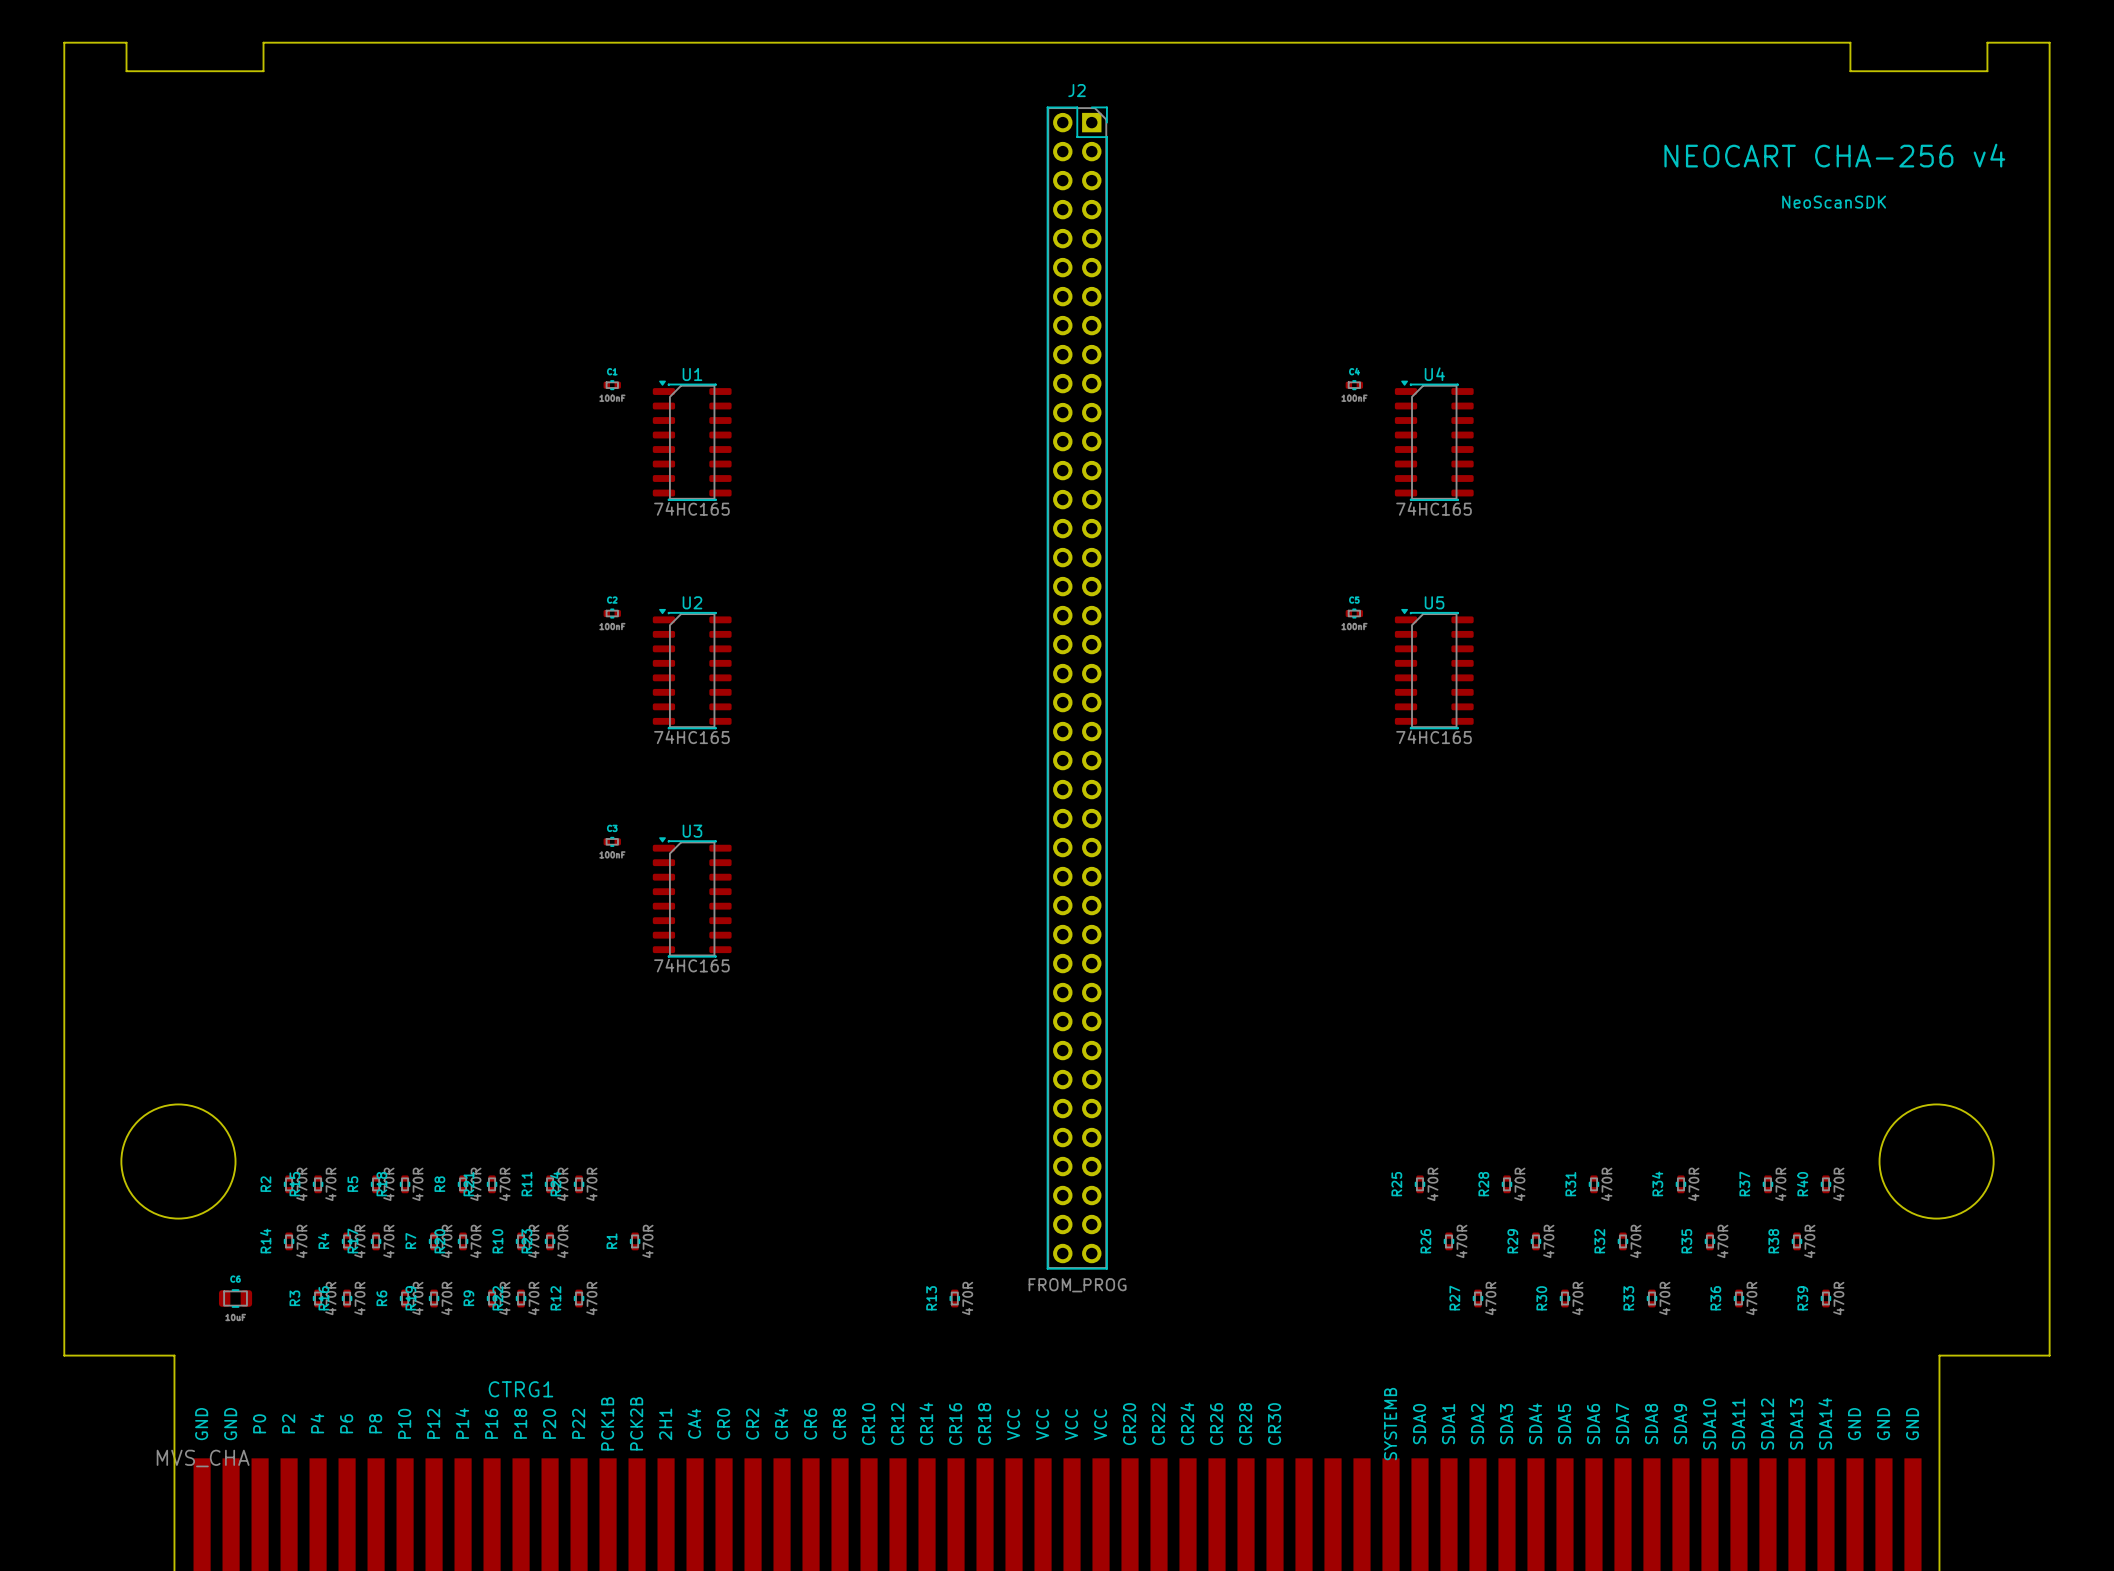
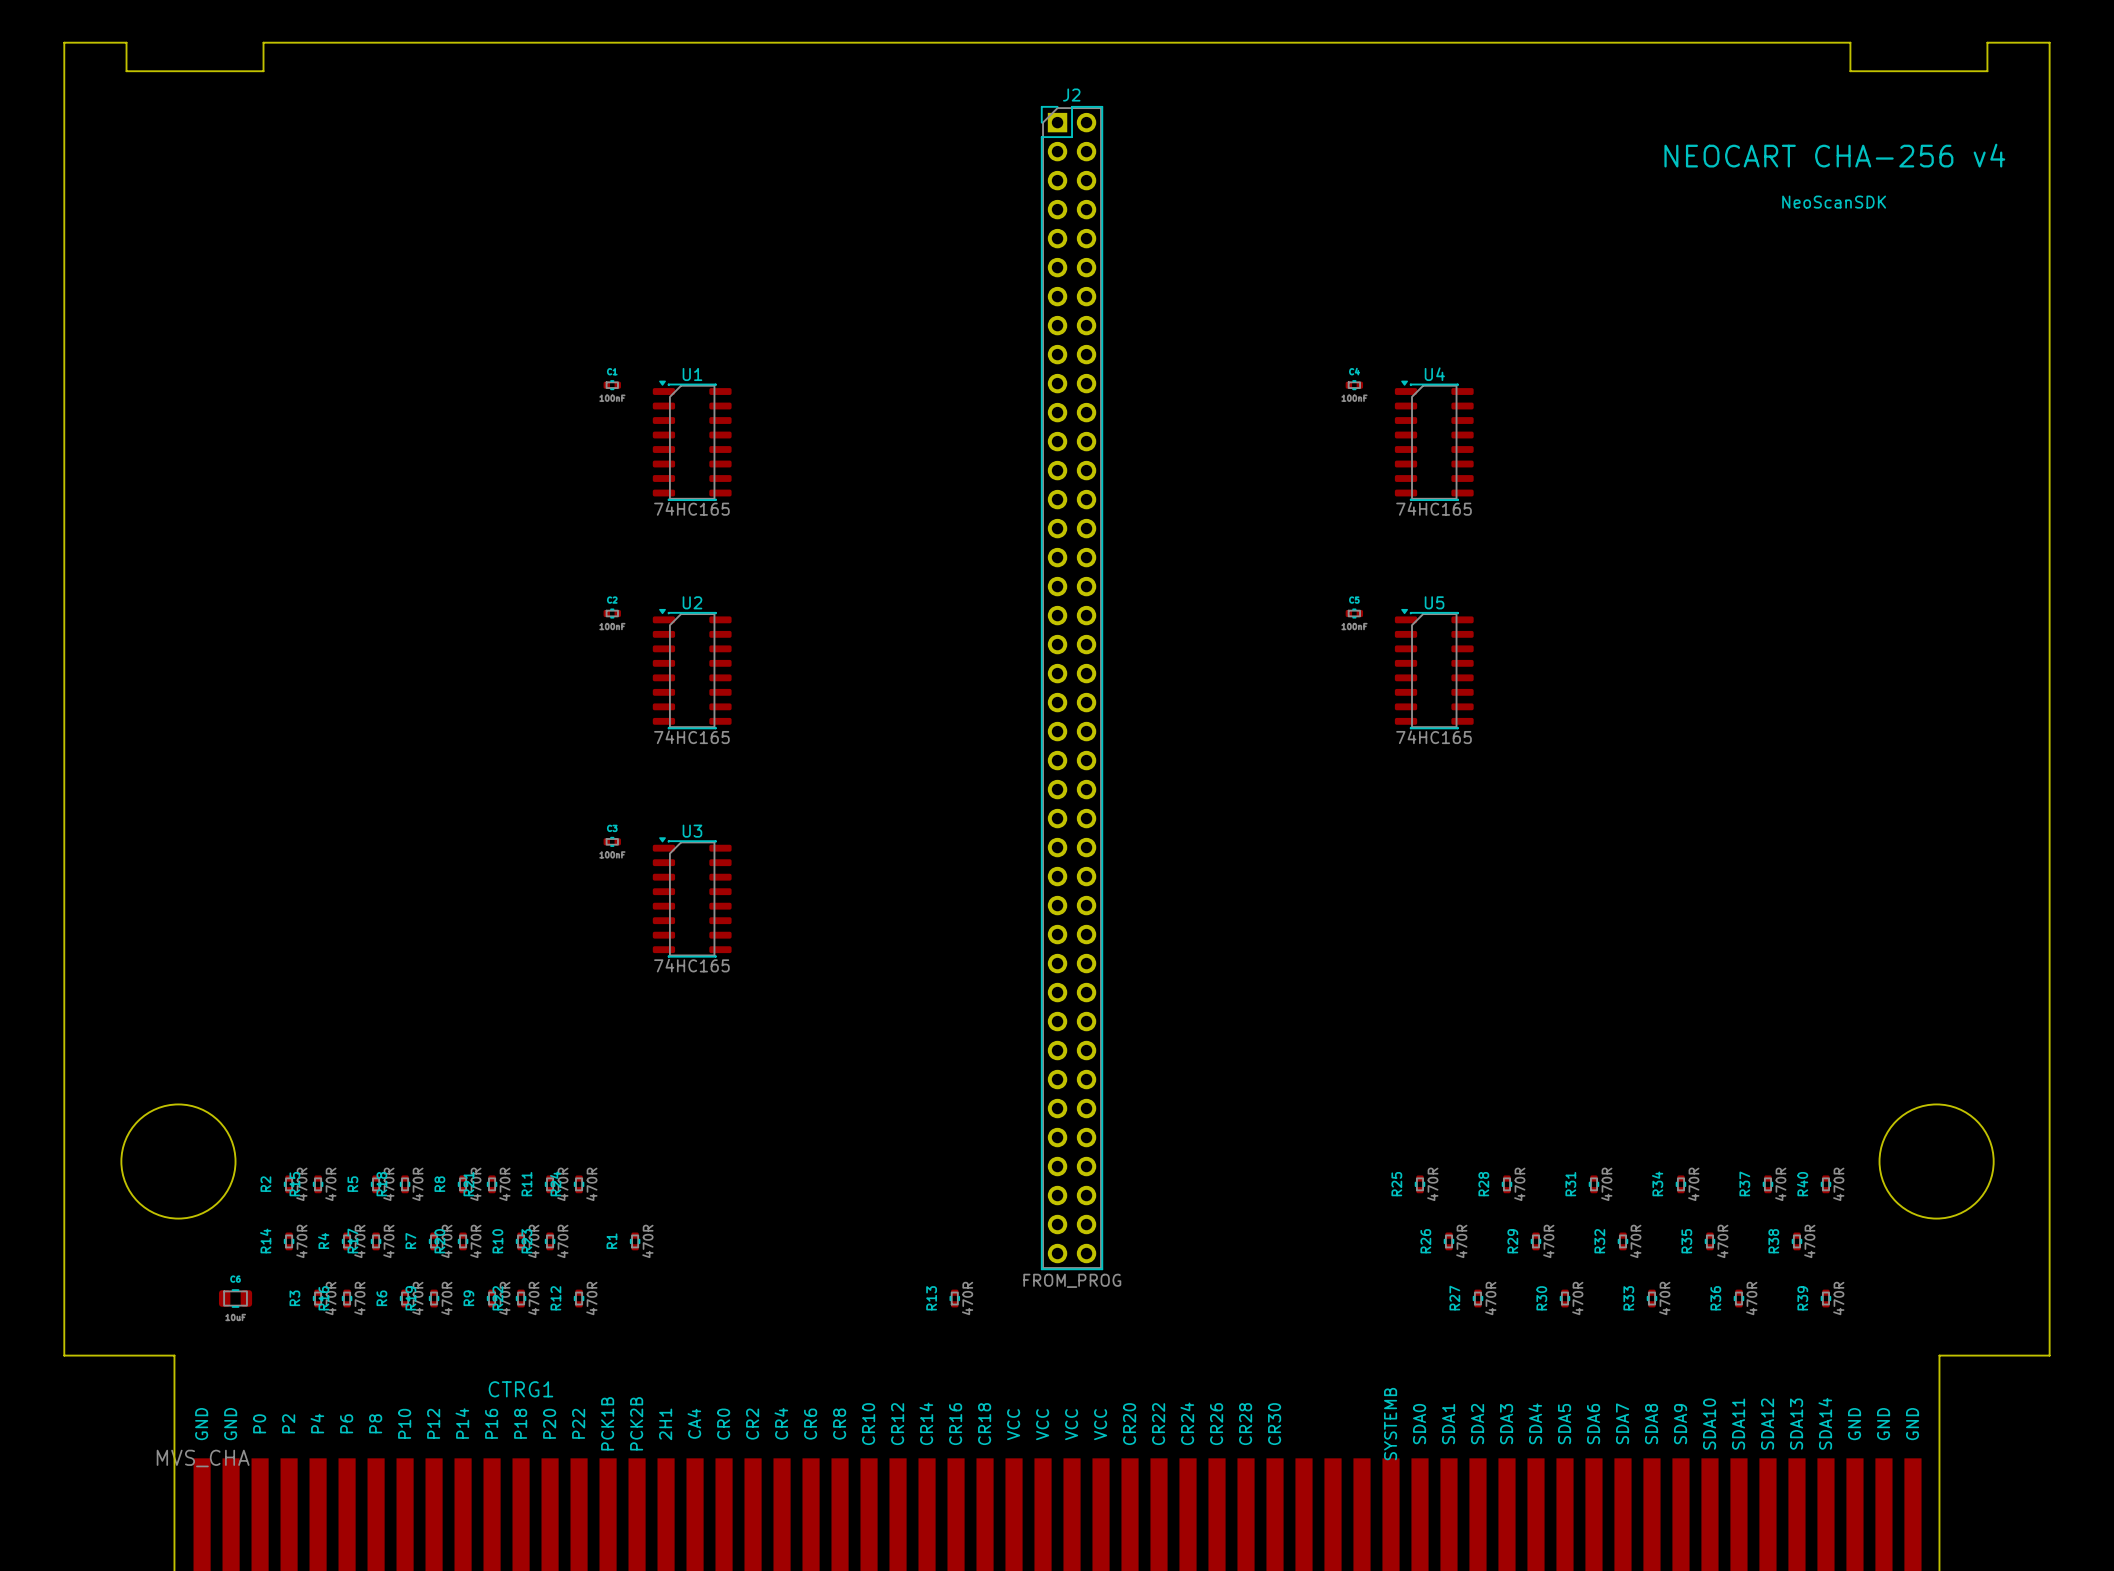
J2 footprint: [1046, 106, 1108, 1270] -> [1041, 106, 1103, 1270]

